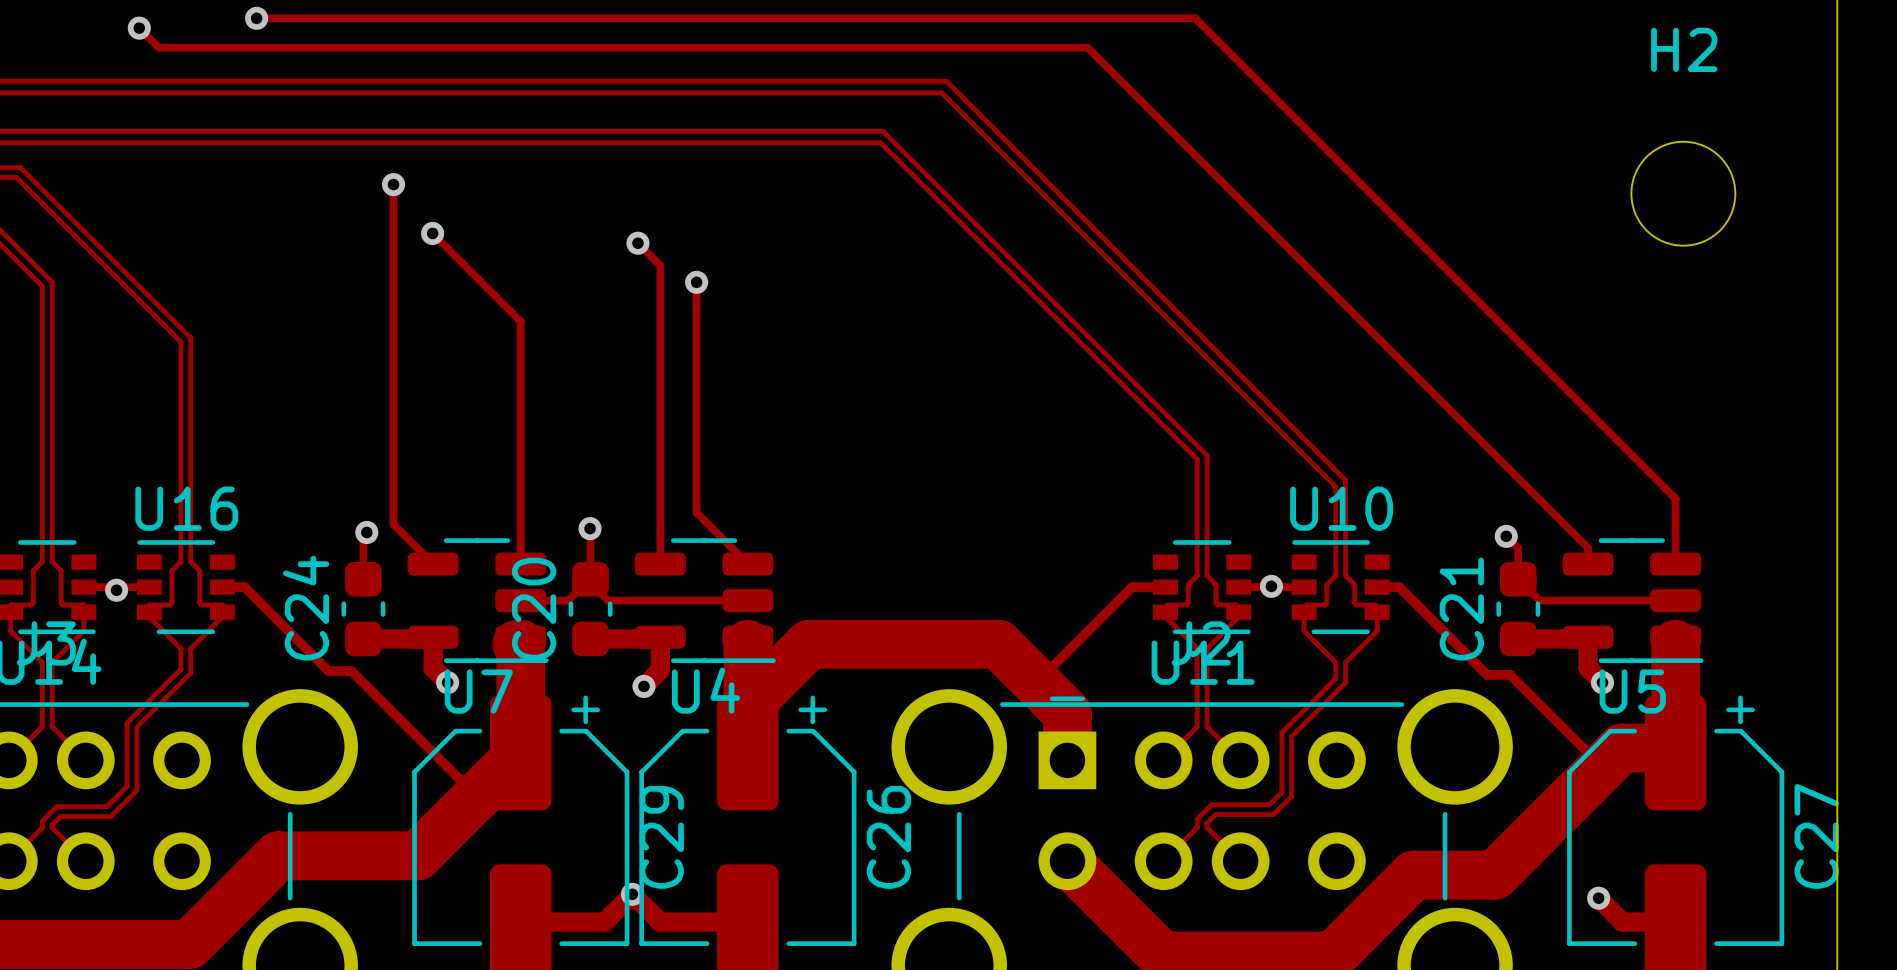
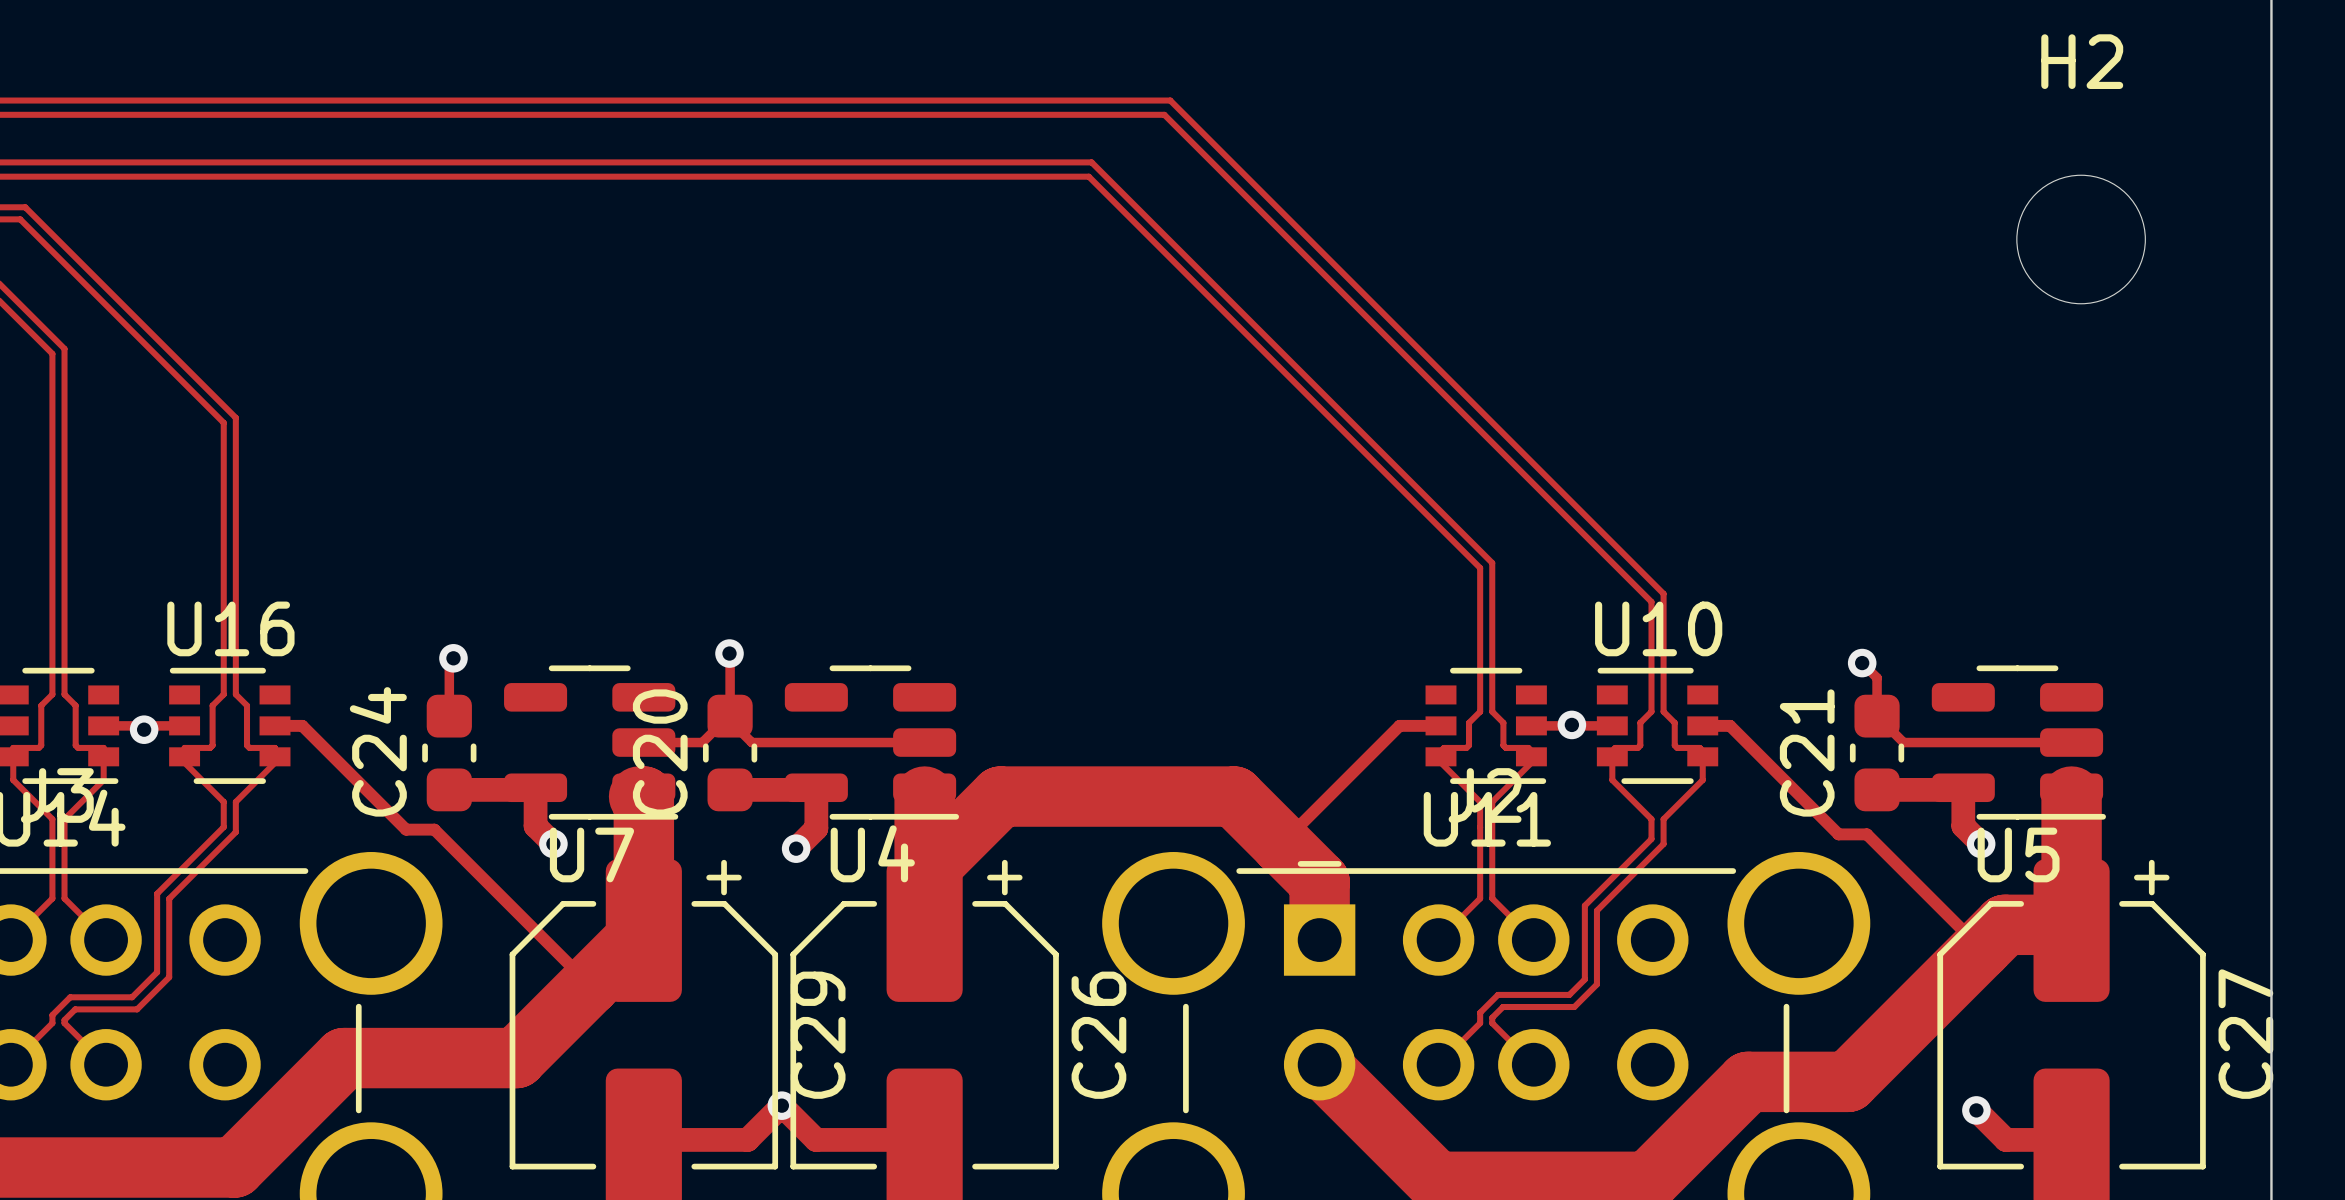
track: (256, 18) (1195, 18) (1675, 498) (1675, 564) -> none
via: (256, 18) -> none
track: (139, 28) (158, 47) (1087, 47) (1588, 548) (1588, 564) -> none
via: (139, 28) -> none
track: (393, 184) (393, 524) (433, 564) -> none
via: (393, 184) -> none
track: (432, 233) (520, 321) (520, 564) -> none
via: (432, 233) -> none
track: (637, 243) (660, 265) (660, 564) -> none
via: (637, 243) -> none
track: (696, 282) (696, 512) (747, 564) -> none
via: (696, 282) -> none

